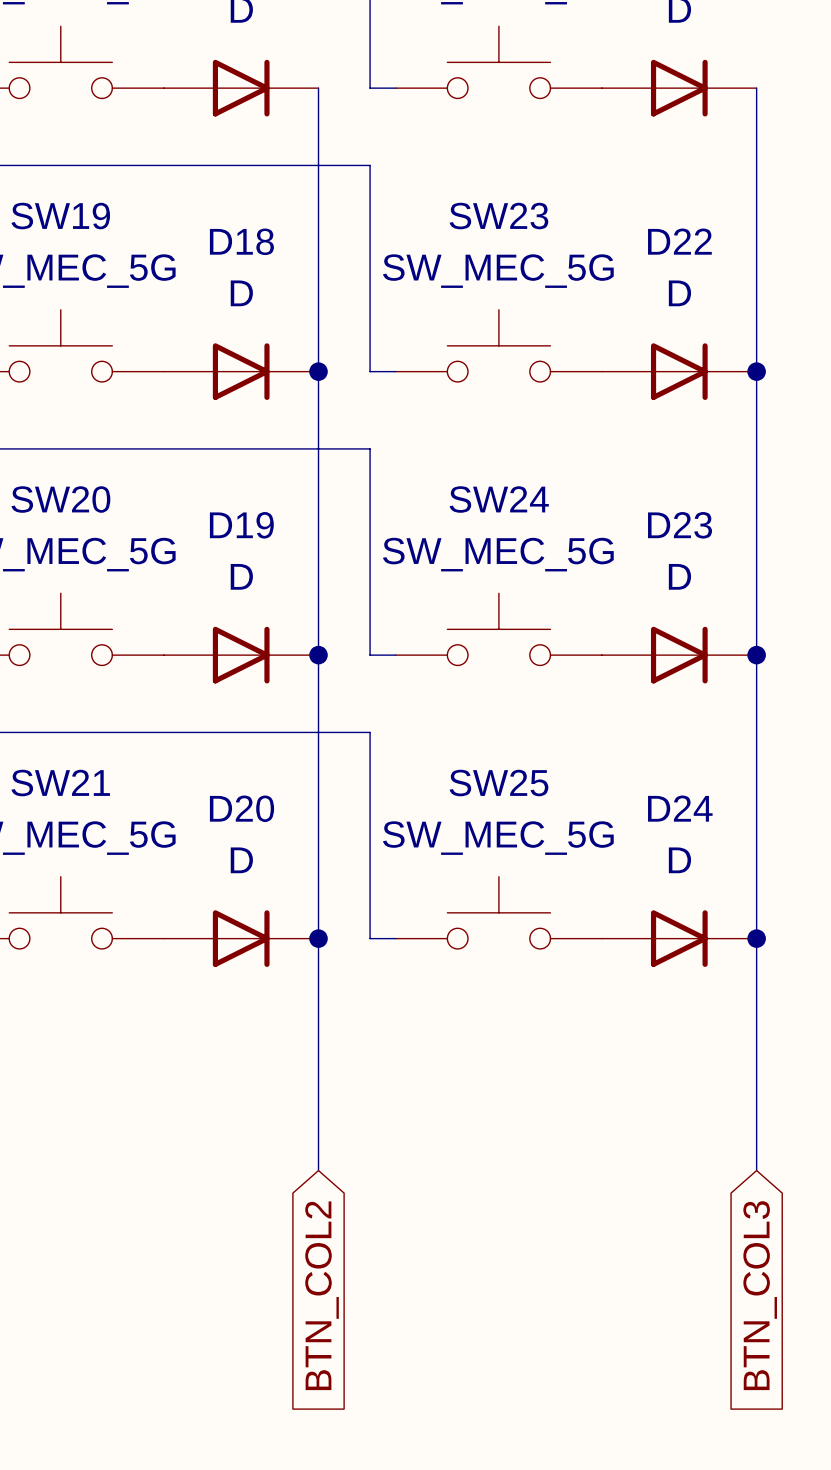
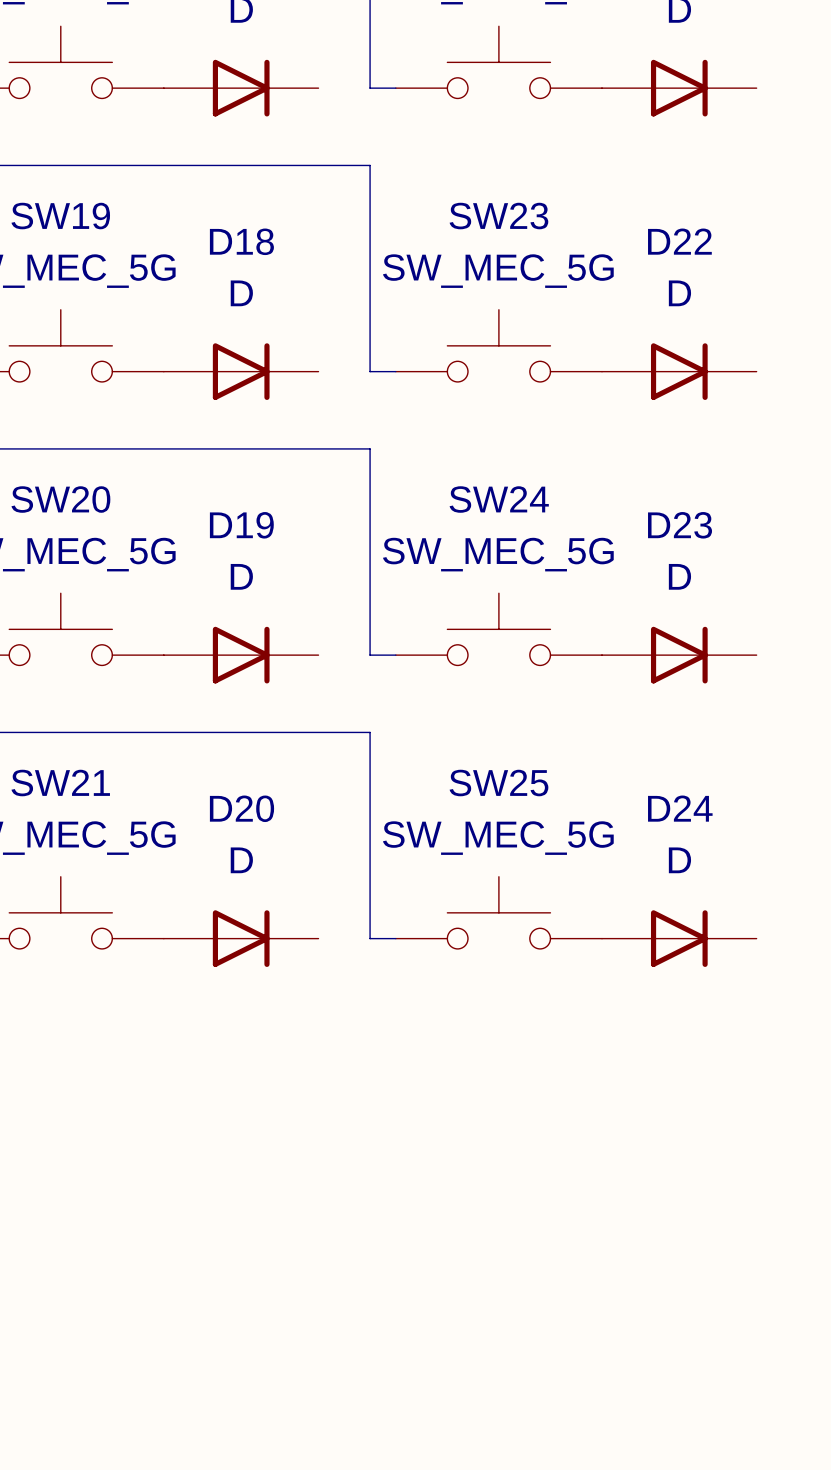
wire: (318, 88) (318, 1170) -> none
wire: (756, 88) (756, 1170) -> none
junction: (318, 371) -> none
junction: (756, 371) -> none
junction: (318, 655) -> none
junction: (756, 655) -> none
junction: (318, 938) -> none
junction: (756, 938) -> none
global label: BTN_COL2 (322, 1295) -> none
global label: BTN_COL3 (760, 1295) -> none

